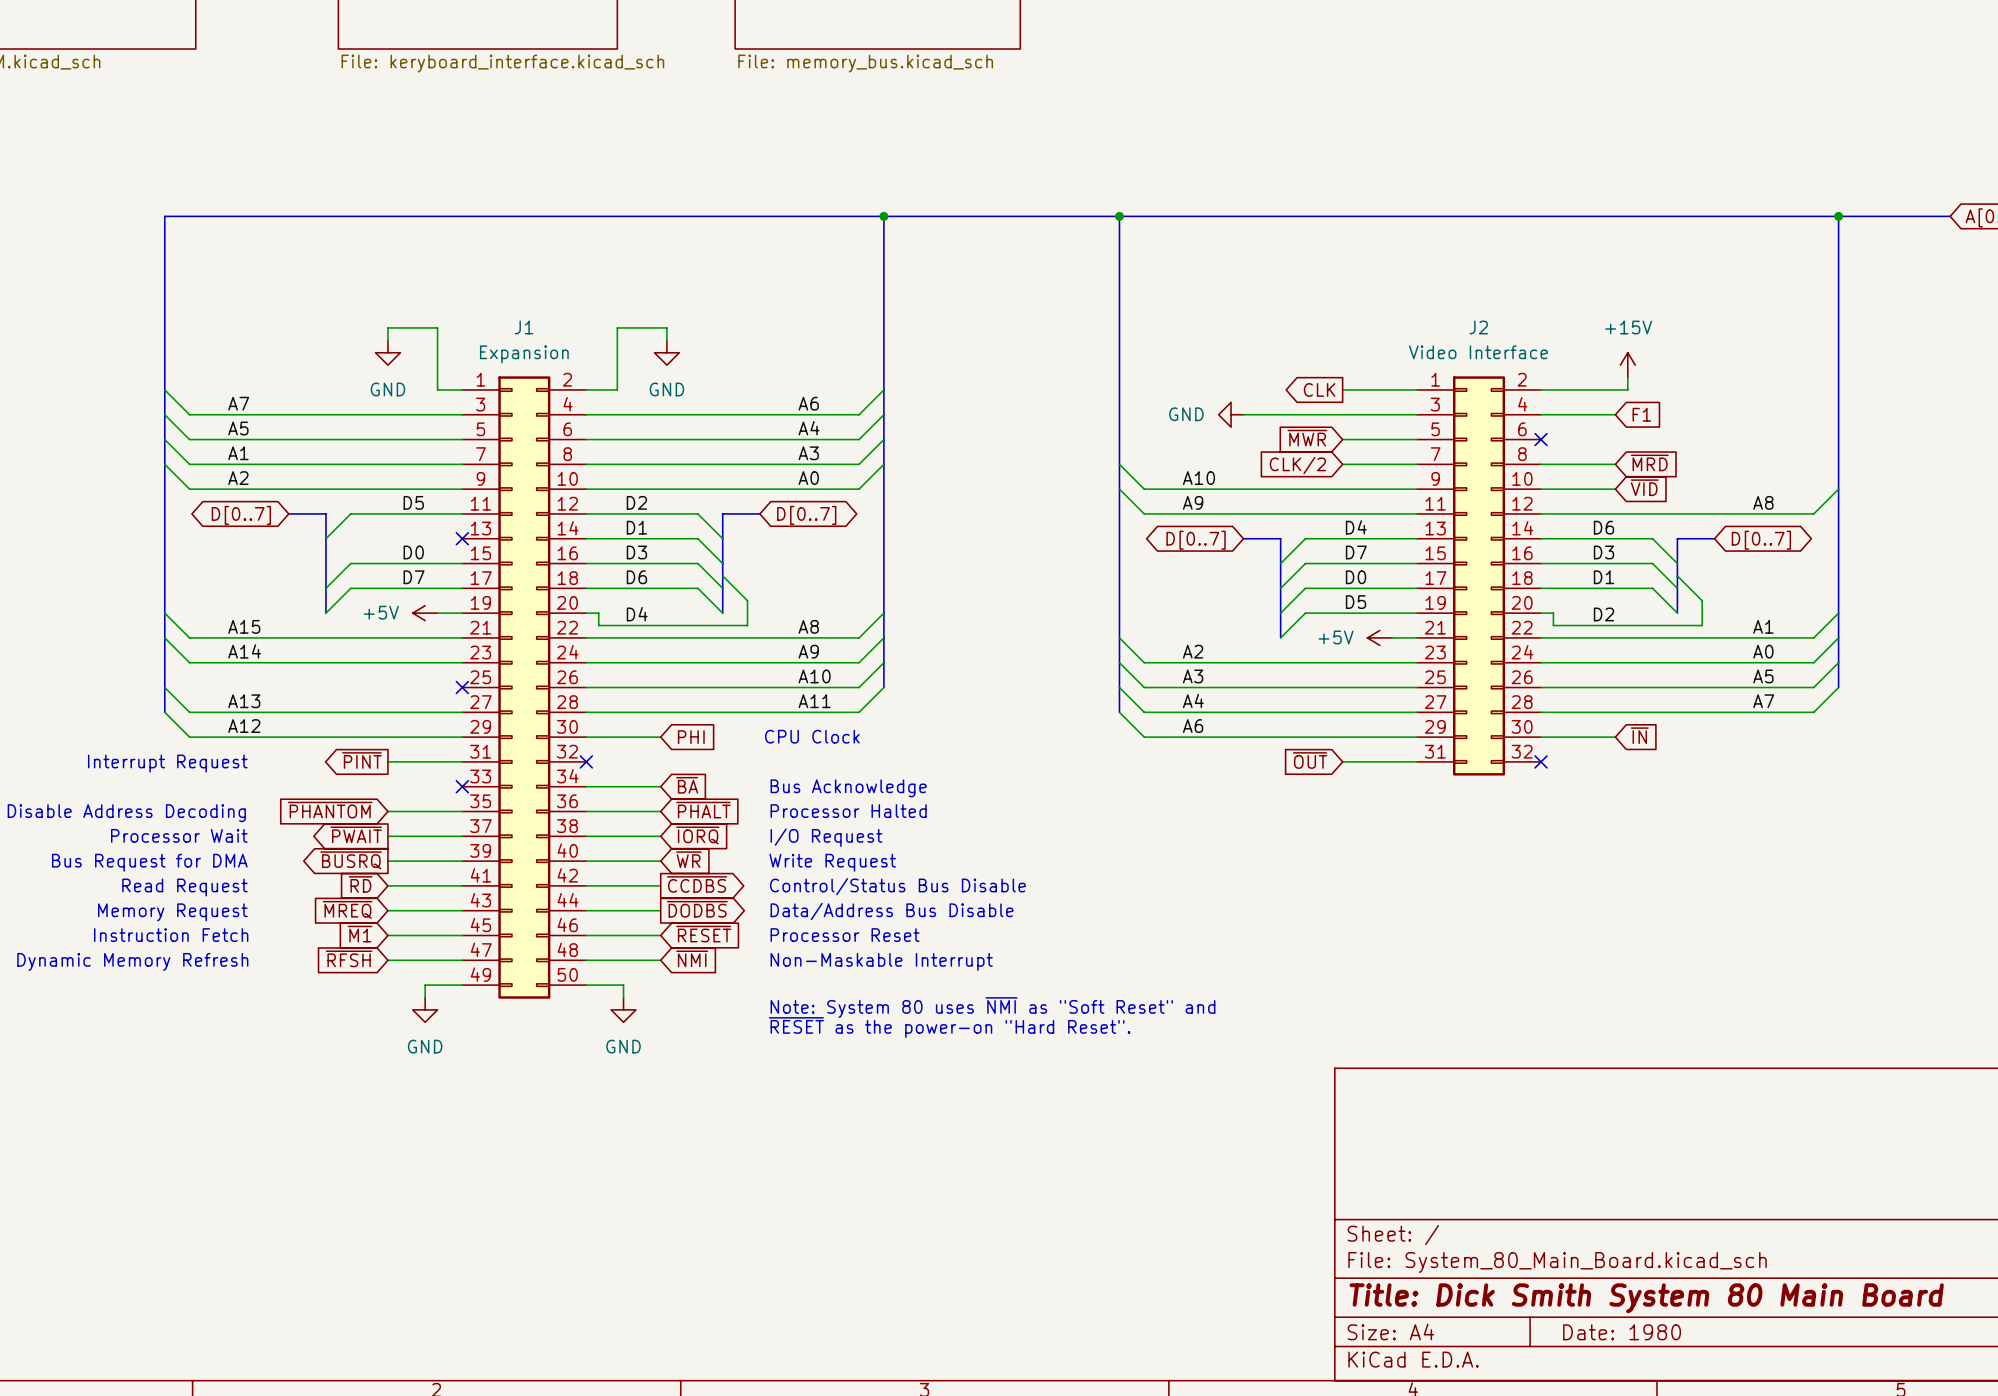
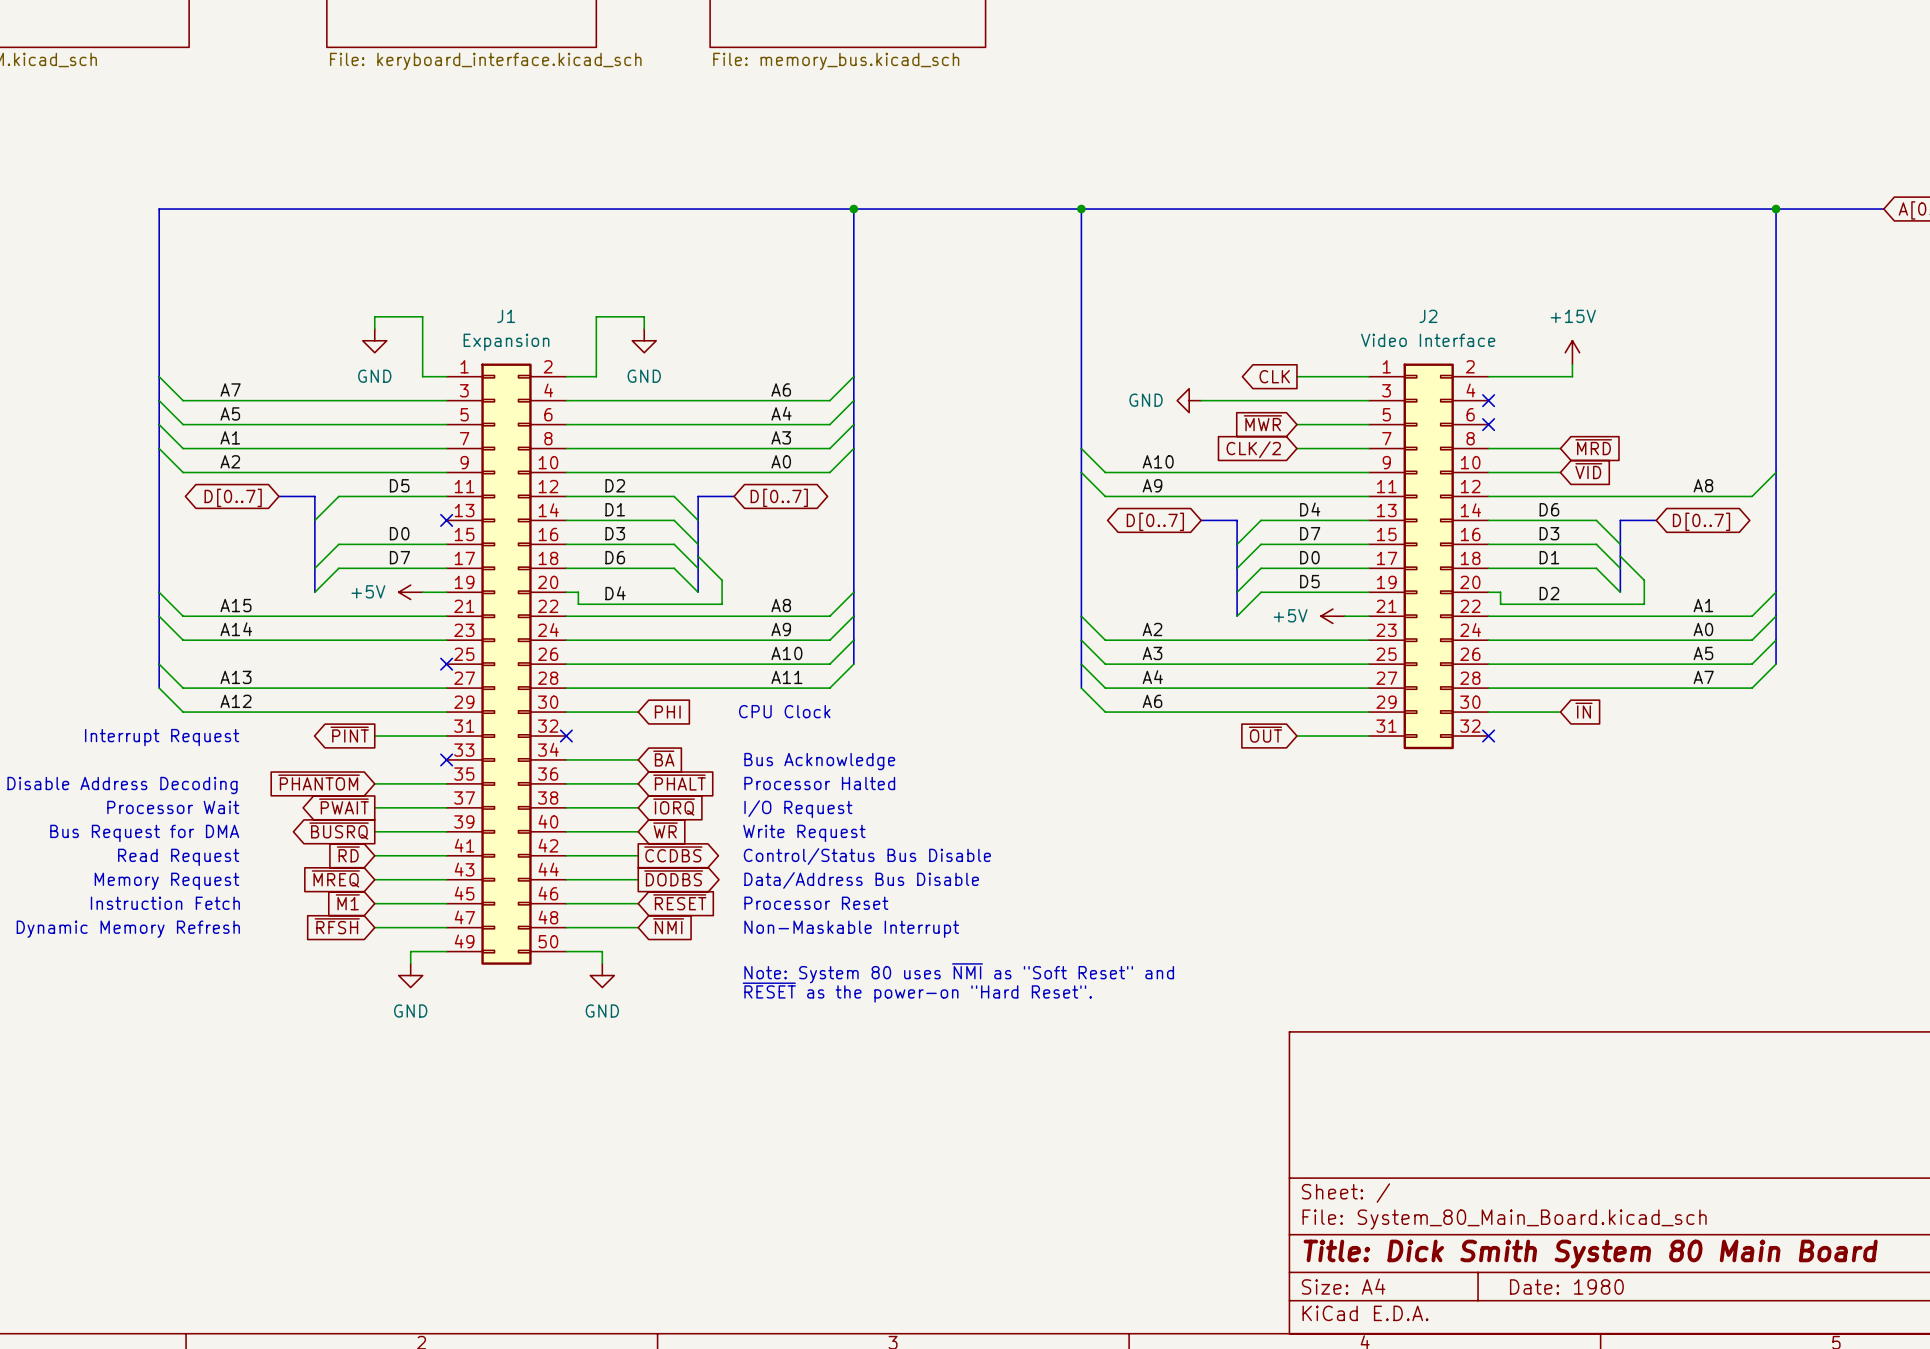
wire: (1541, 414) (1615, 414) -> none
no-connect mark: none -> (1488, 400)
global label: F1 (1641, 414) -> none

